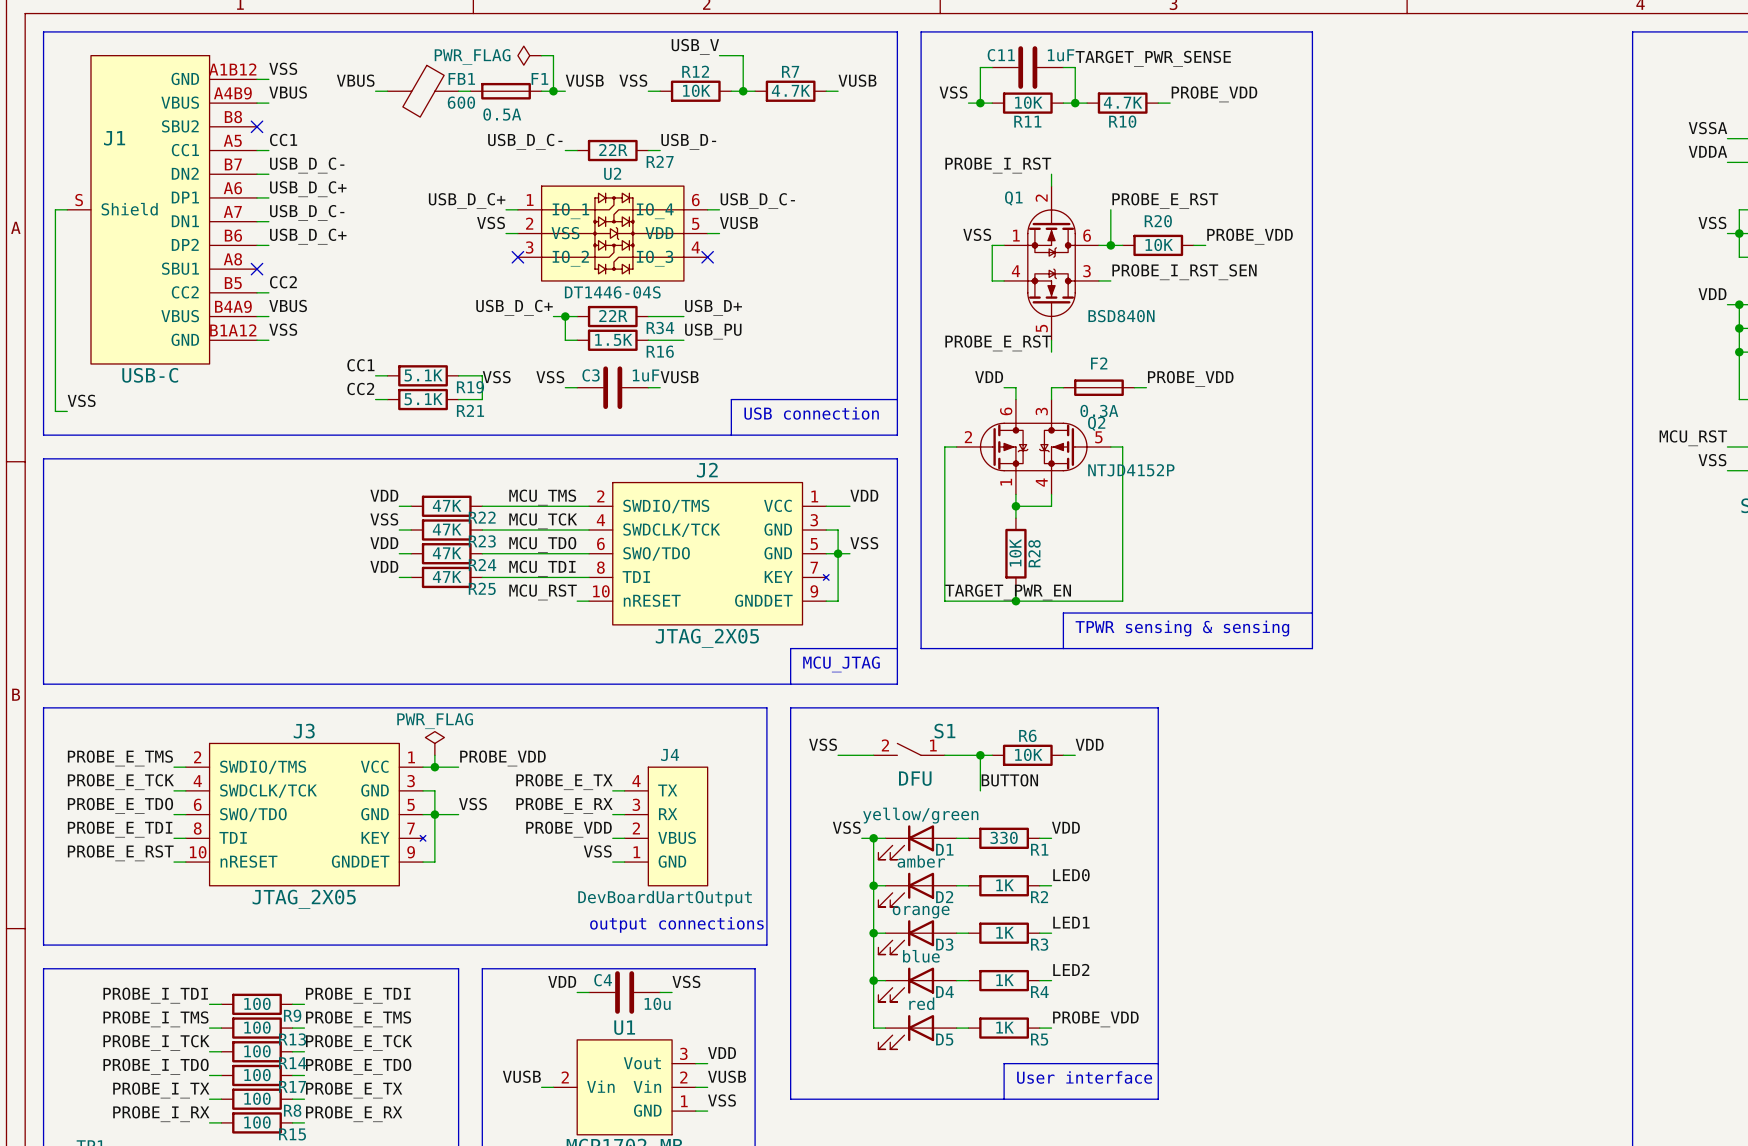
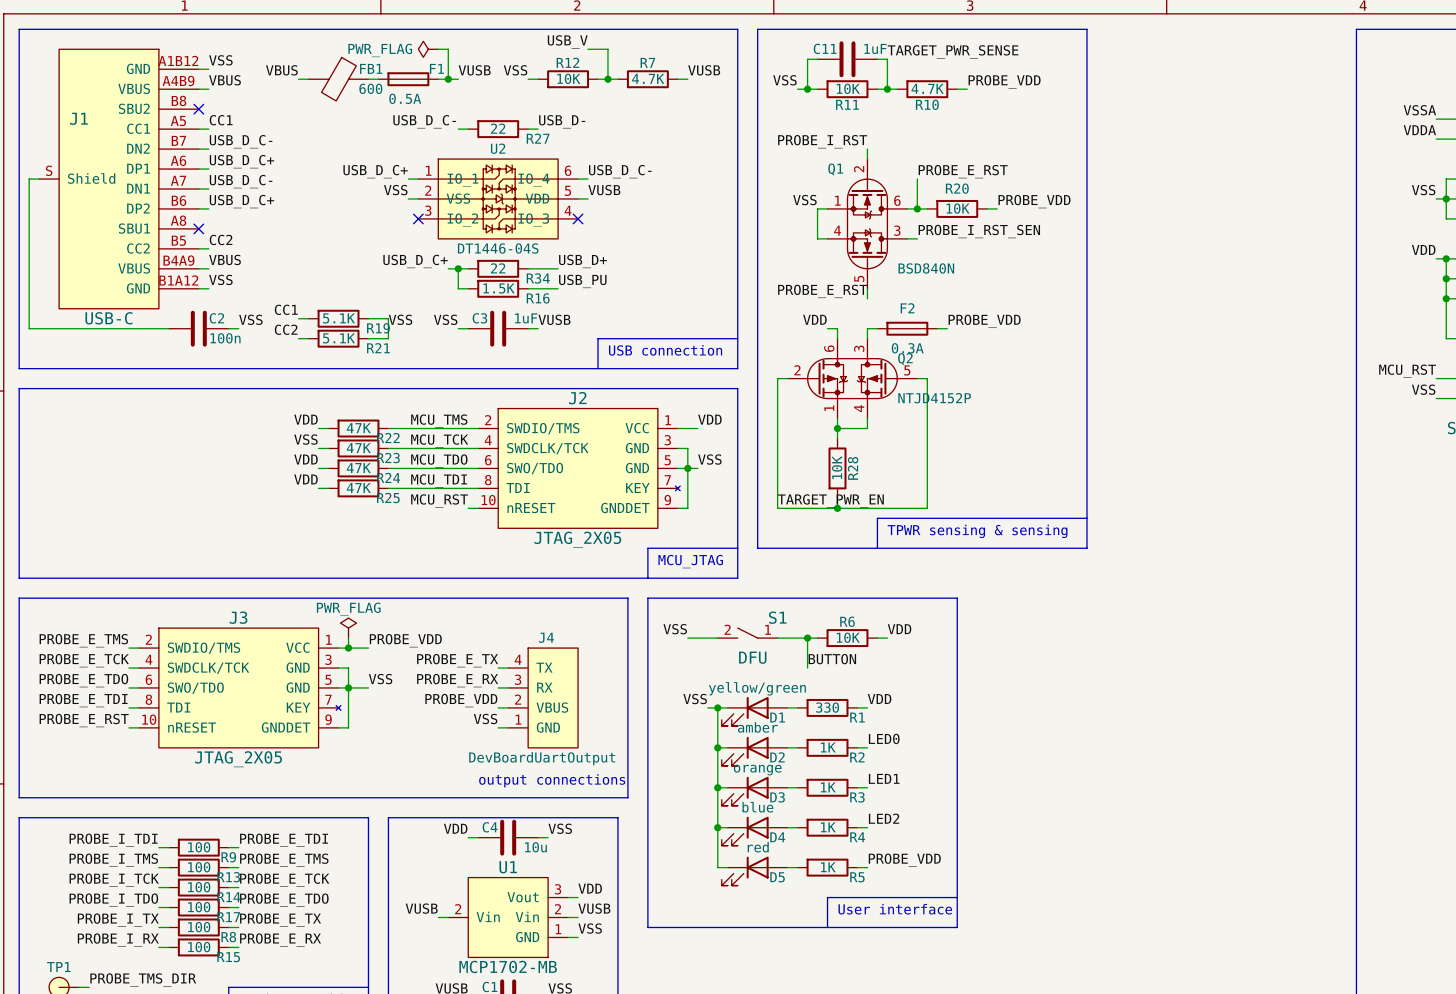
R27 value: 22R (613, 149) -> 22 (498, 128)
R34 value: 22R (613, 316) -> 22 (498, 268)
label: none -> VSS (250, 319)
wire: (55, 387) (55, 411) (67, 411) -> (29, 328) (168, 328)
C2: none -> 100n (198, 328)
wire: none -> (228, 328) (238, 328)
label: VSS (81, 400) -> none

